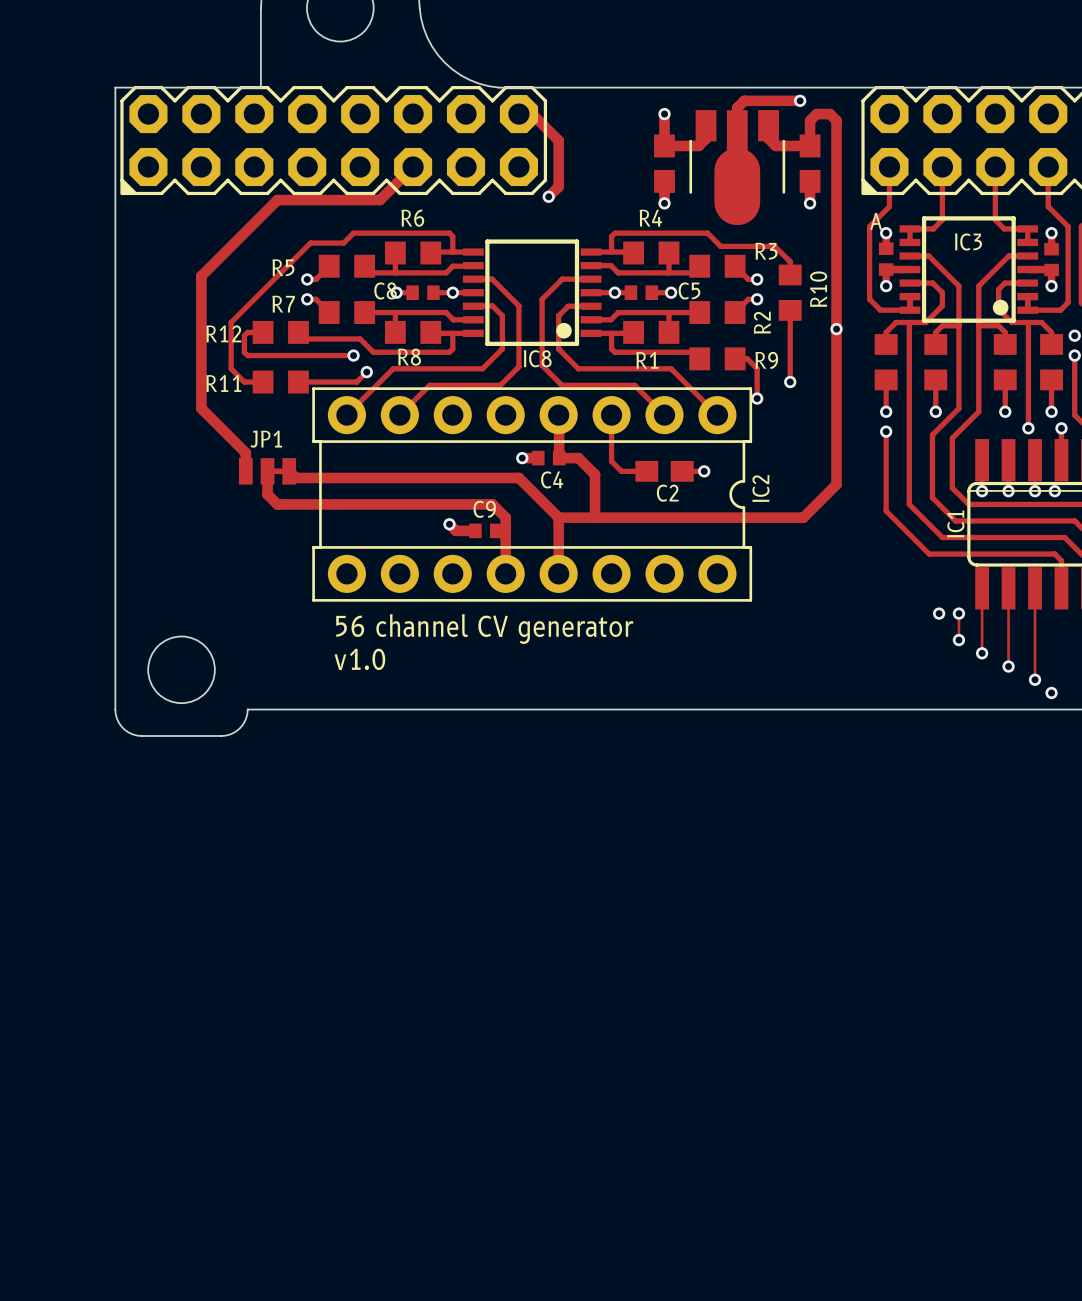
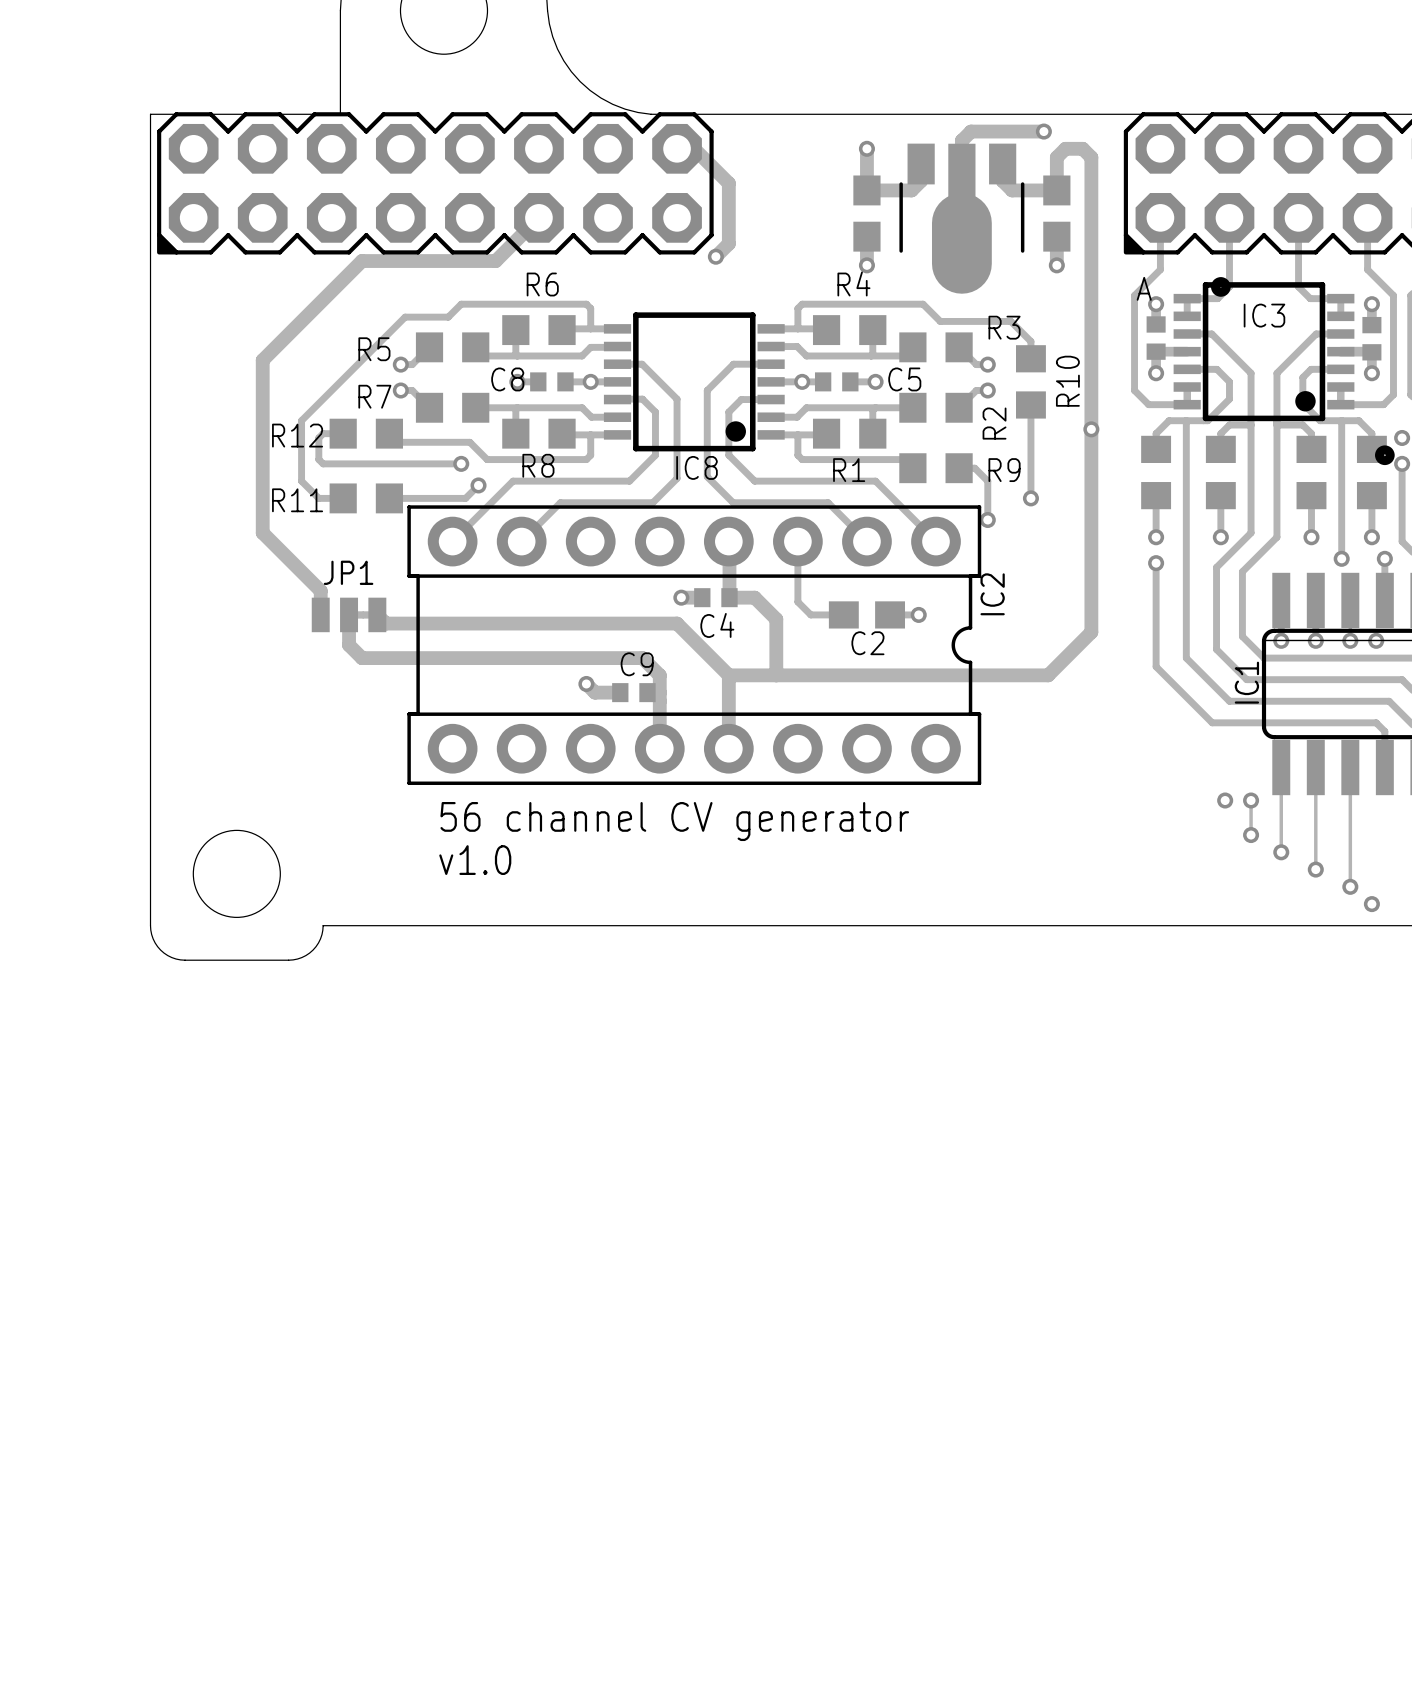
drawing: none -> [1211, 277, 1231, 297]
drawing: none -> [1375, 445, 1395, 466]
IC2 name position: IC2 (760, 488) -> IC2 (992, 594)

